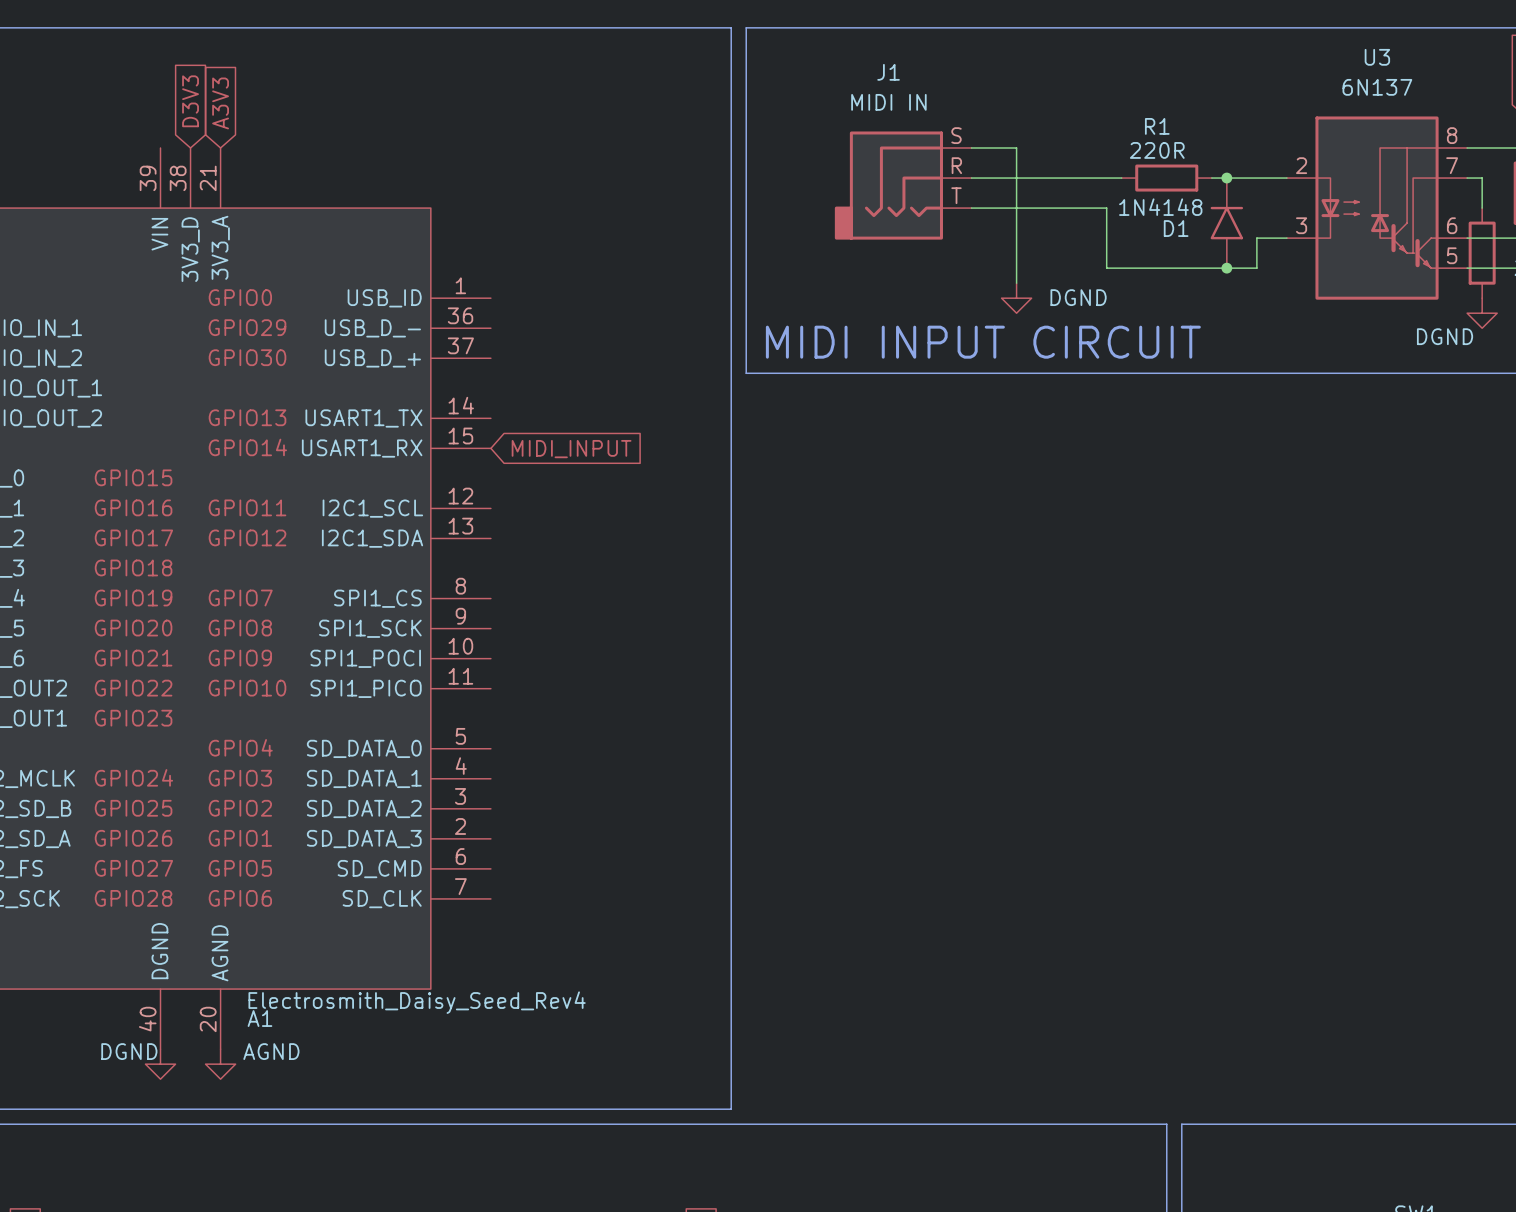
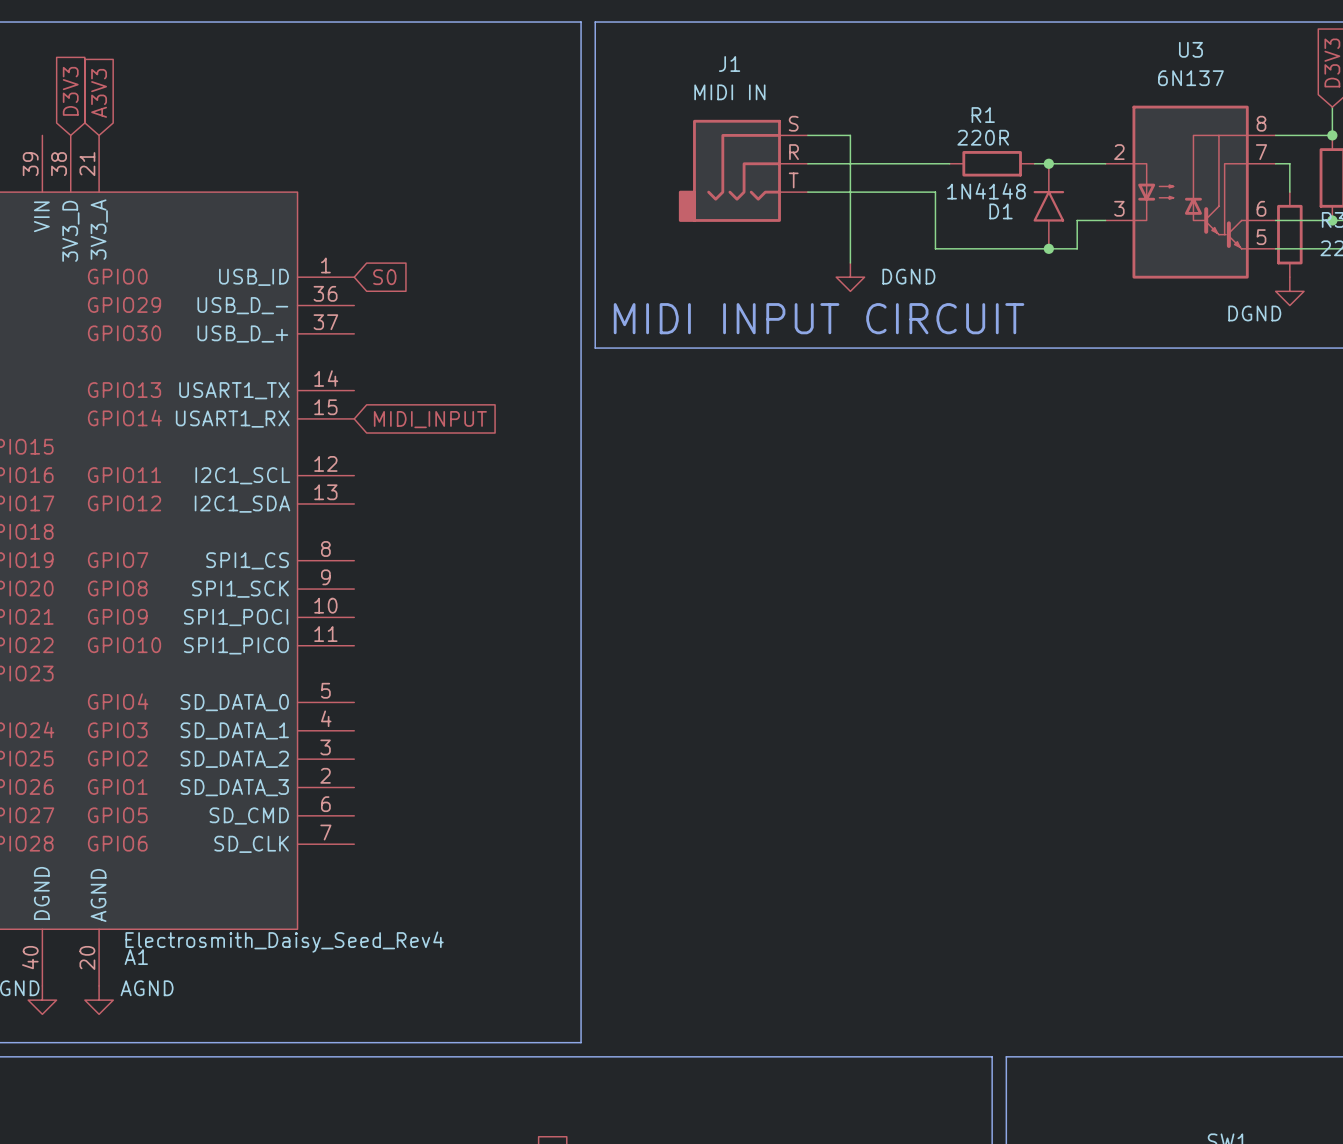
global label: none -> S0 (384, 277)

